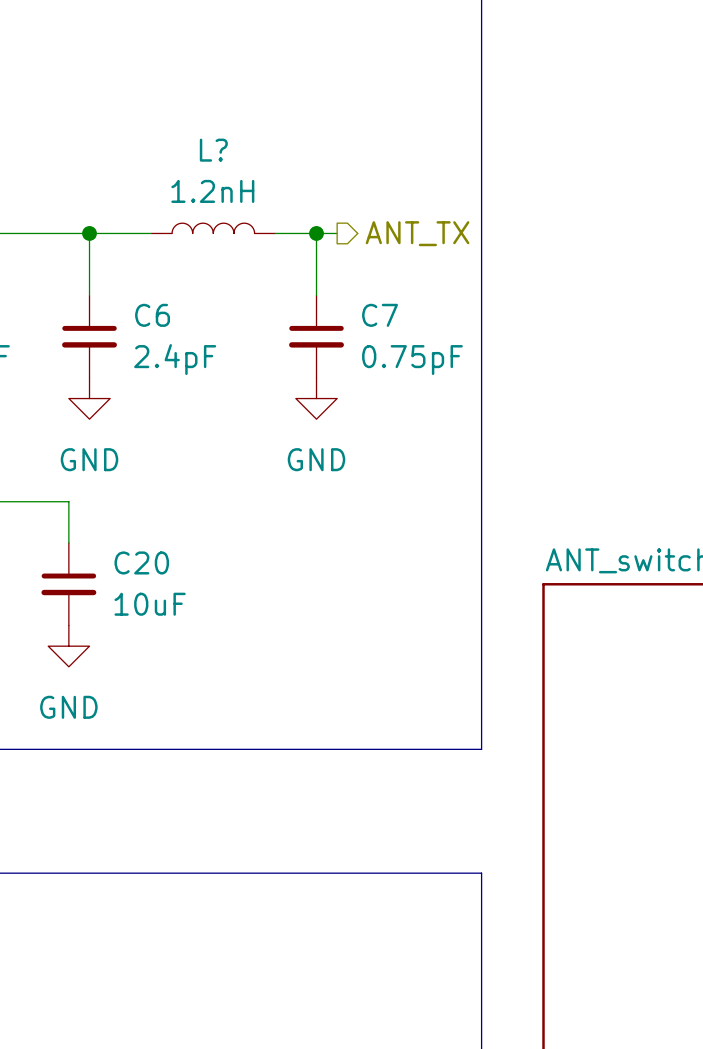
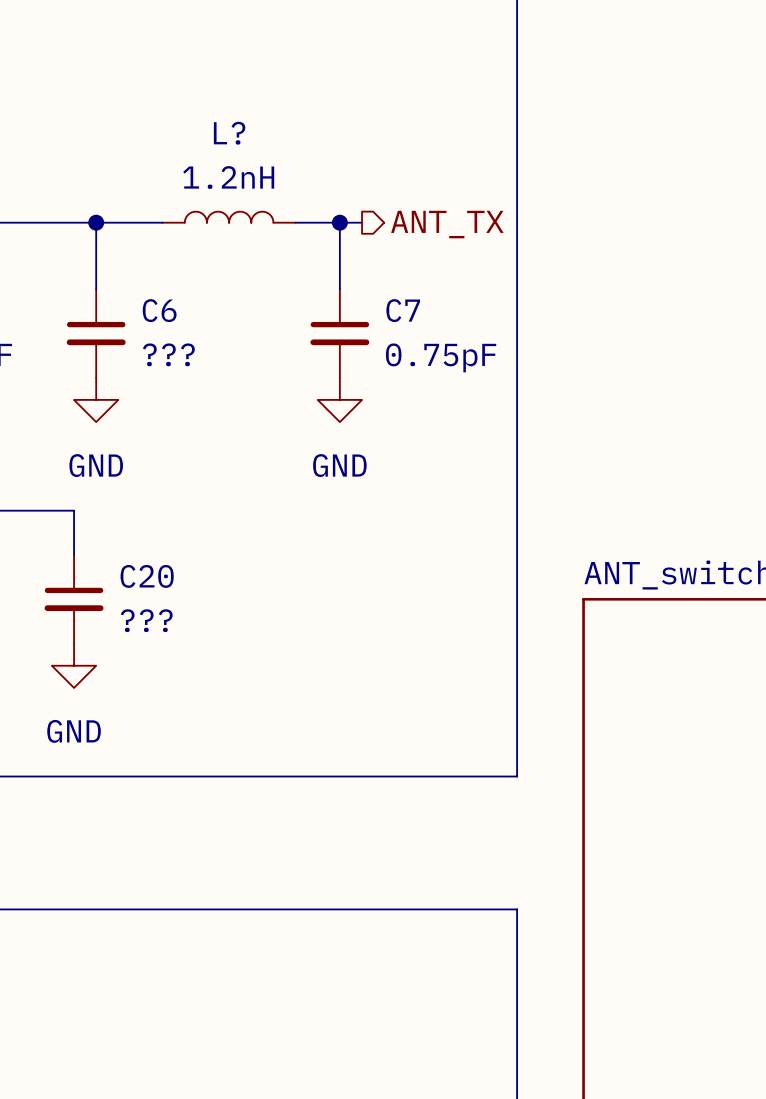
C6 value: 2.4pF (175, 359) -> ??? (168, 354)
C20 value: 10uF (150, 604) -> ??? (146, 620)

